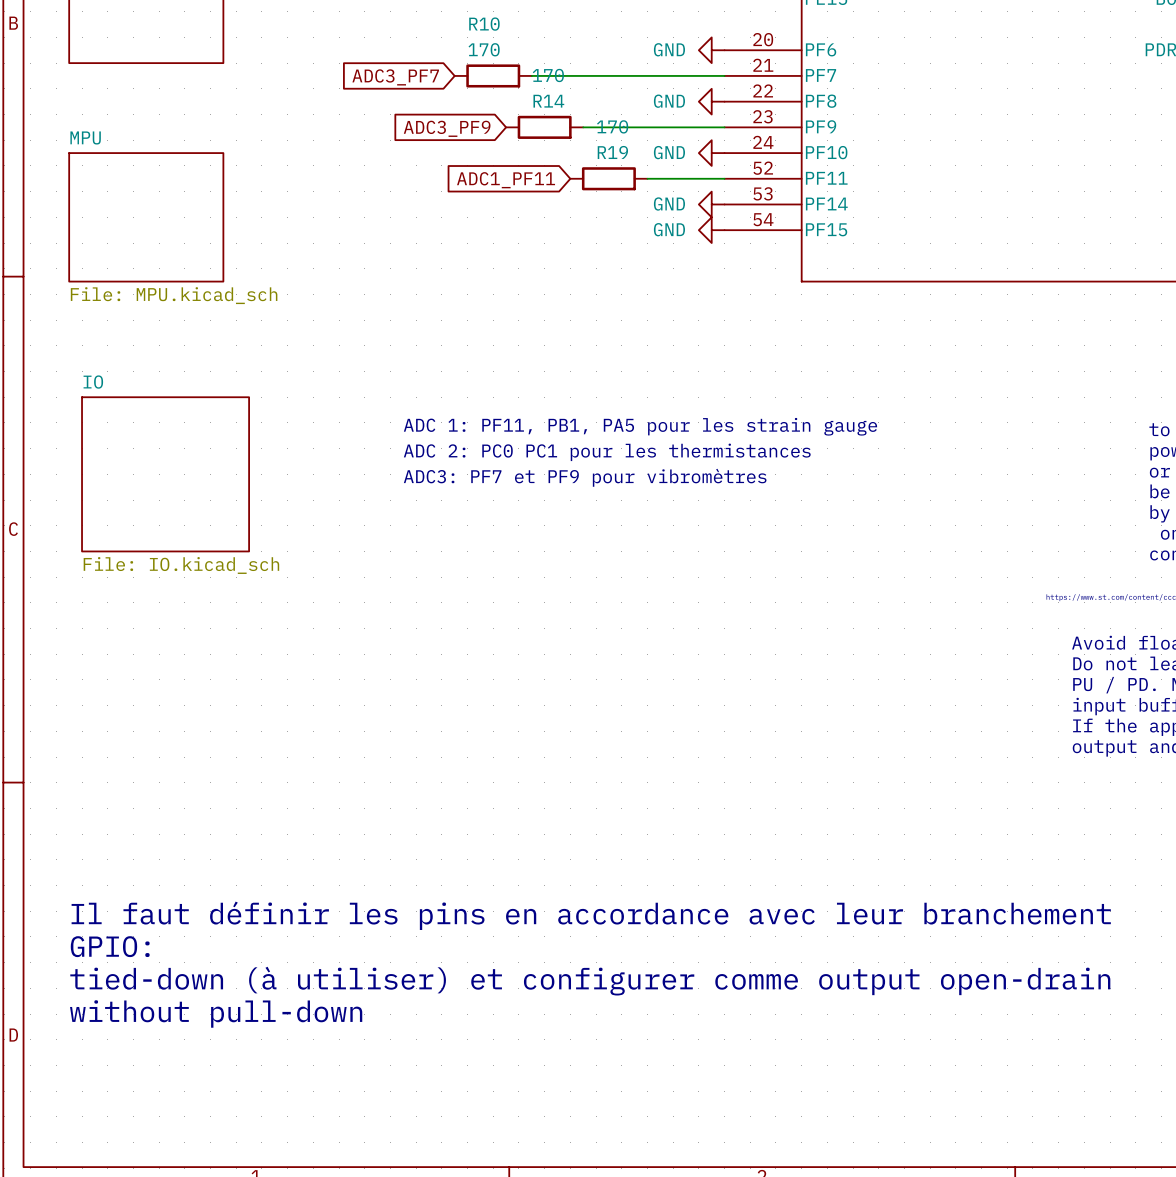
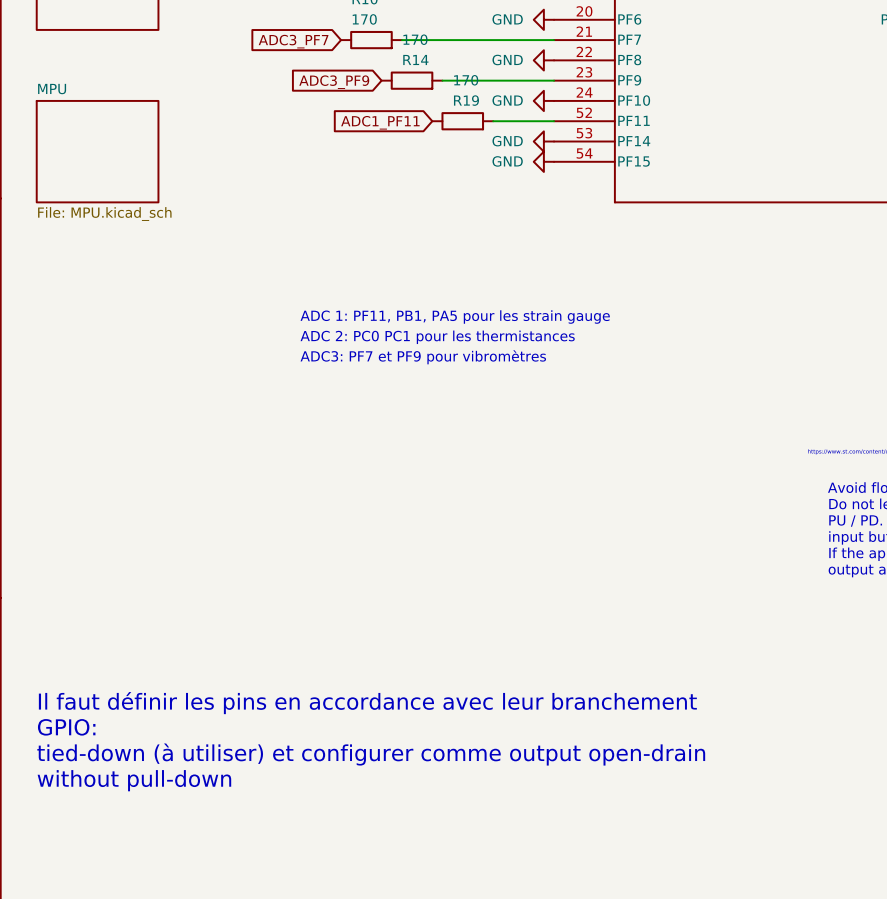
sheet IO: File: IO.kicad_sch (165, 474) -> none

